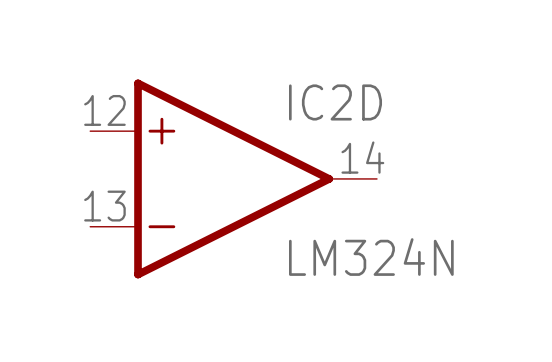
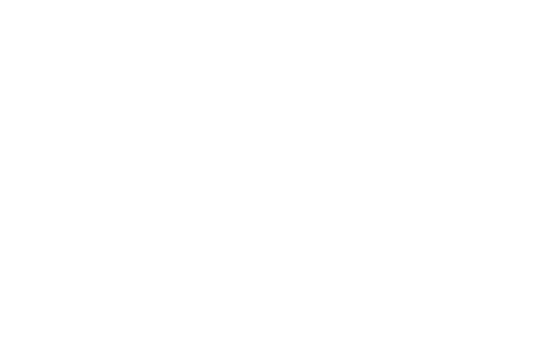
IC2D: LM324N (233, 178) -> none

